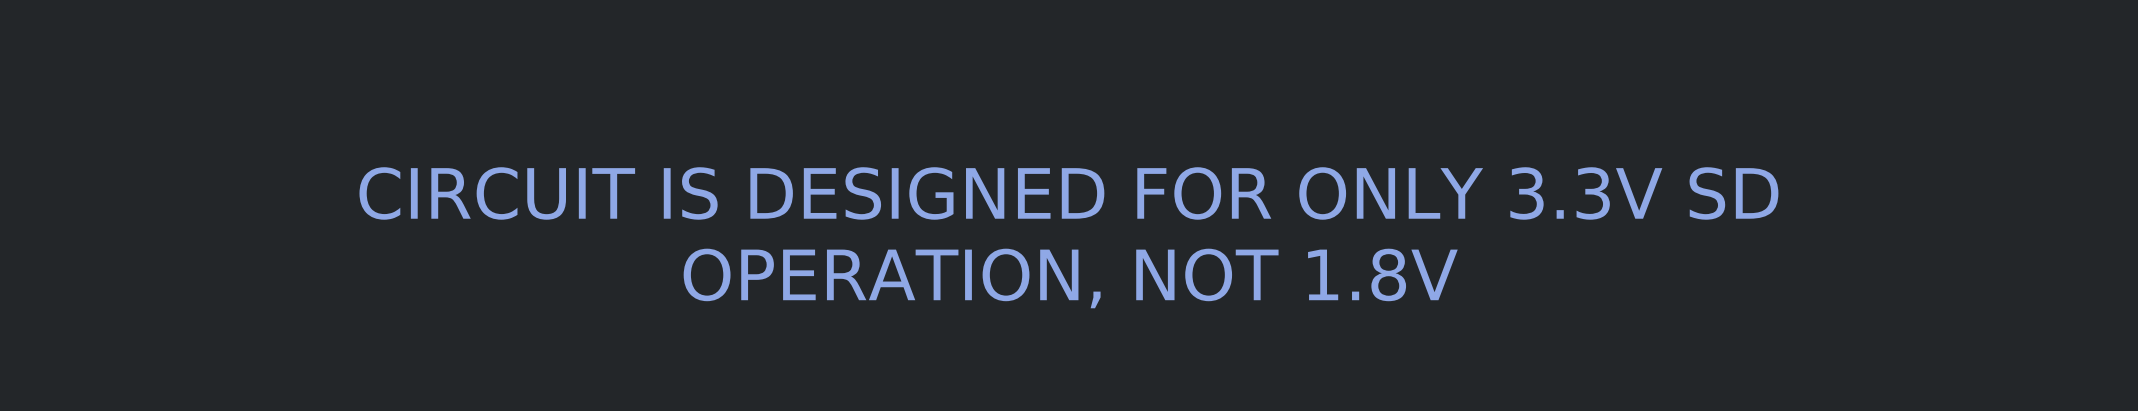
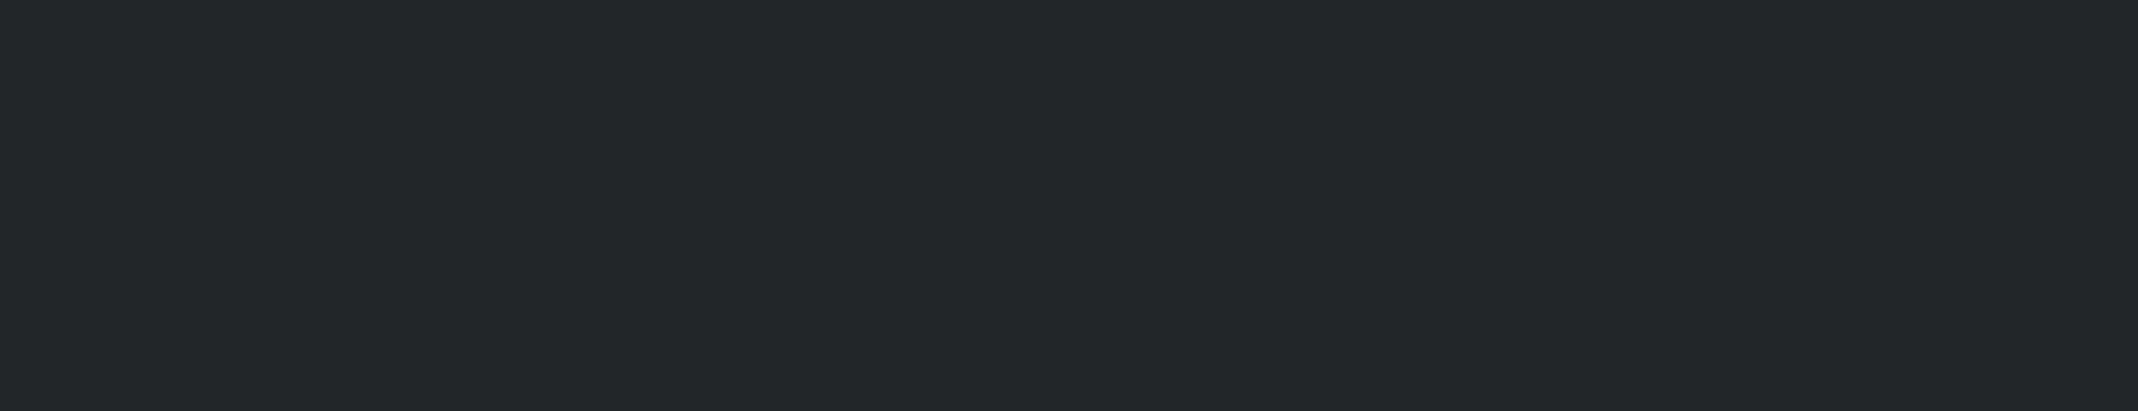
text: CIRCUIT IS DESIGNED FOR ONLY 3.3V SD (1068, 193) -> none
text: OPERATION, NOT 1.8V (1070, 278) -> none

